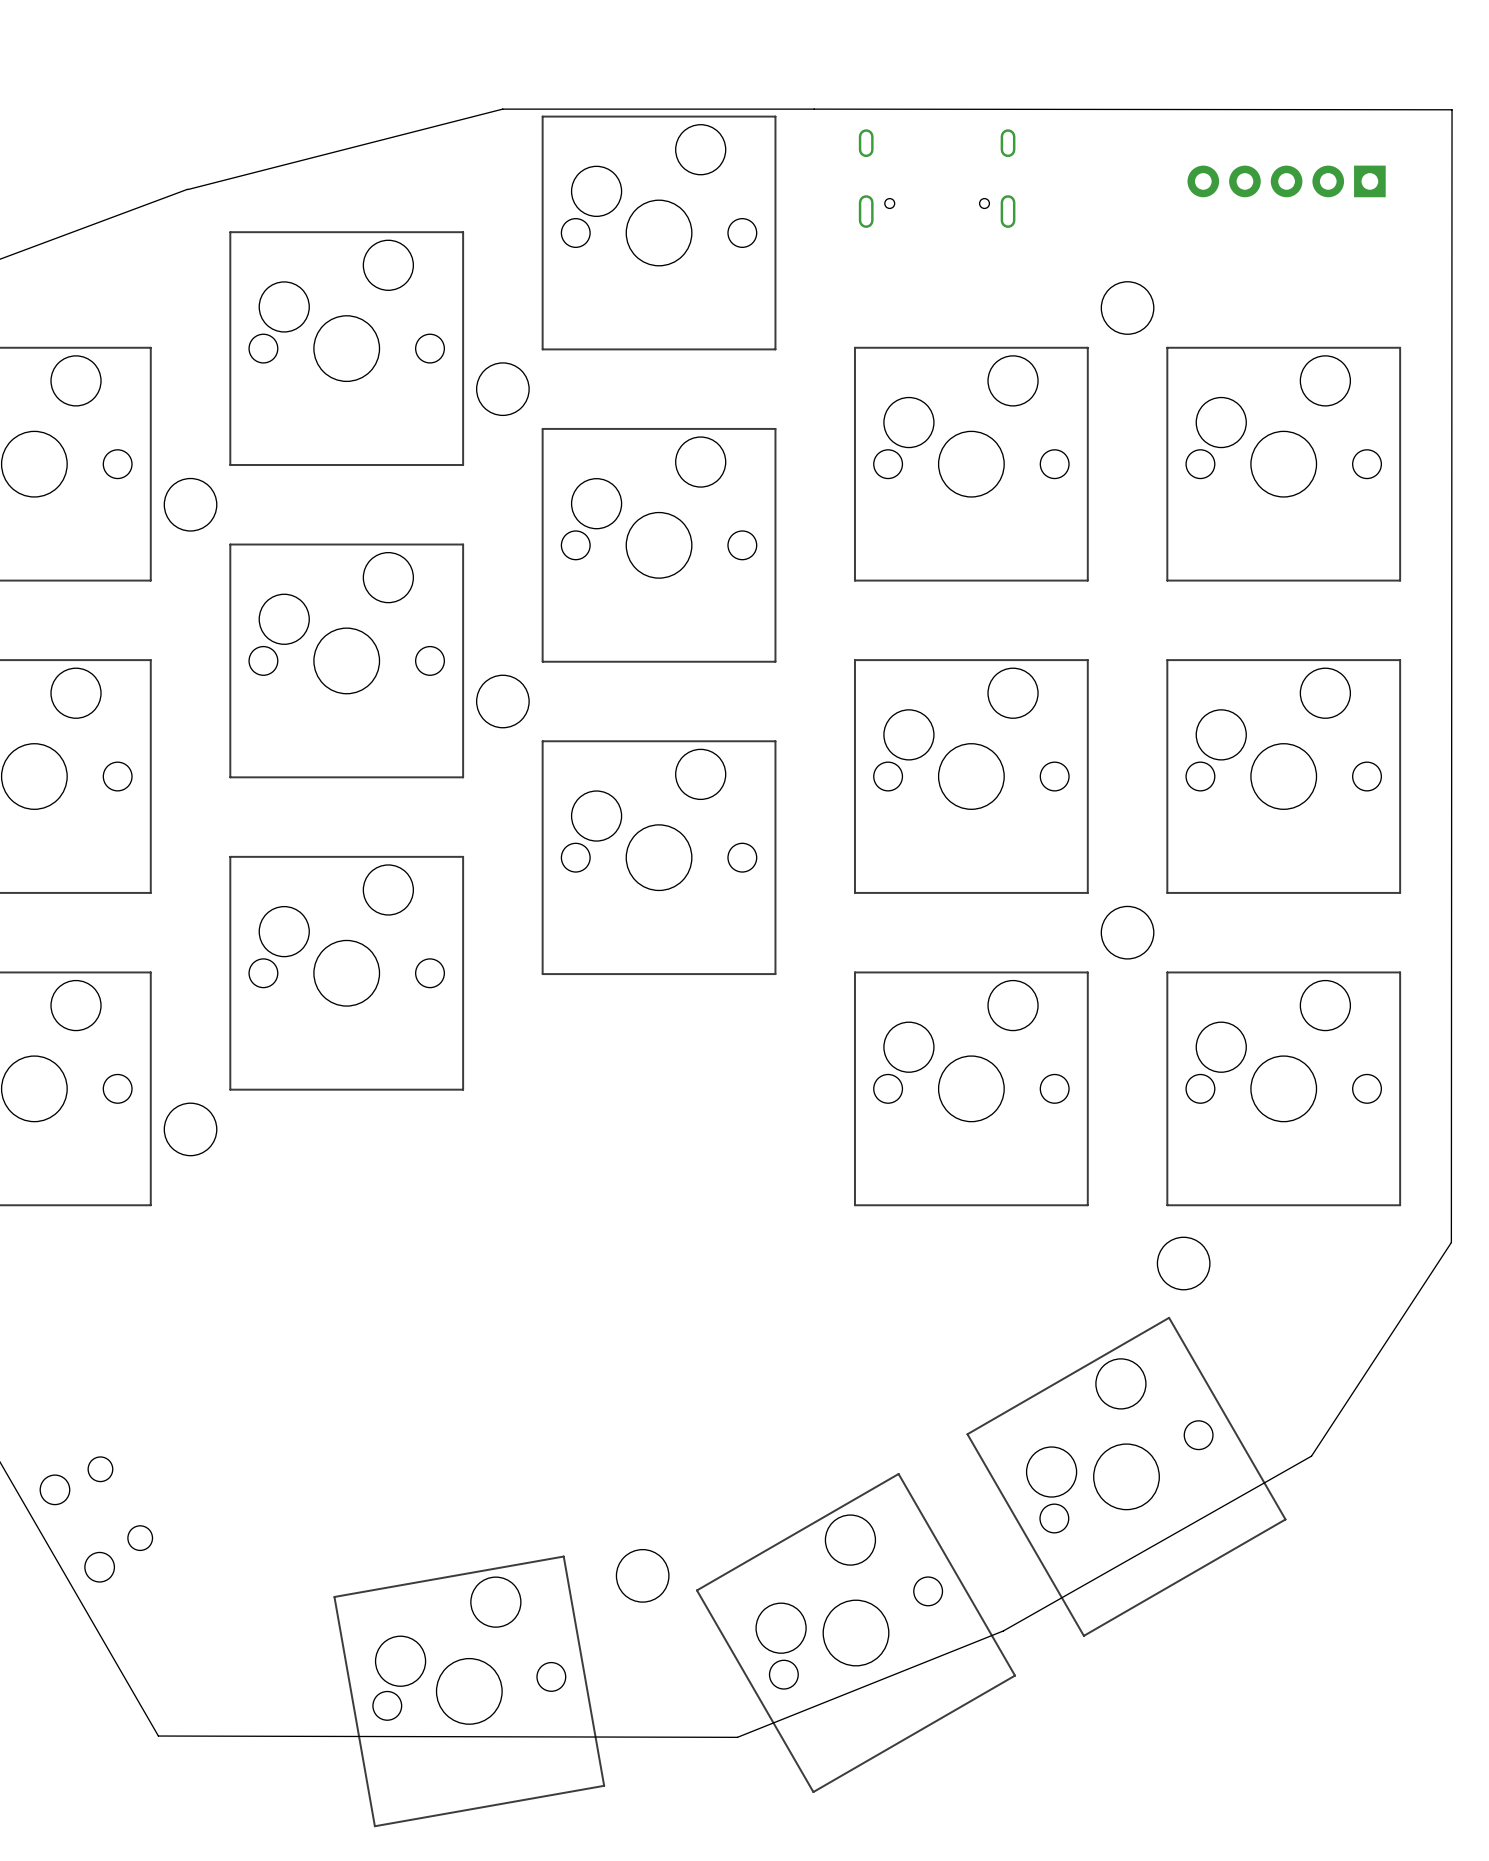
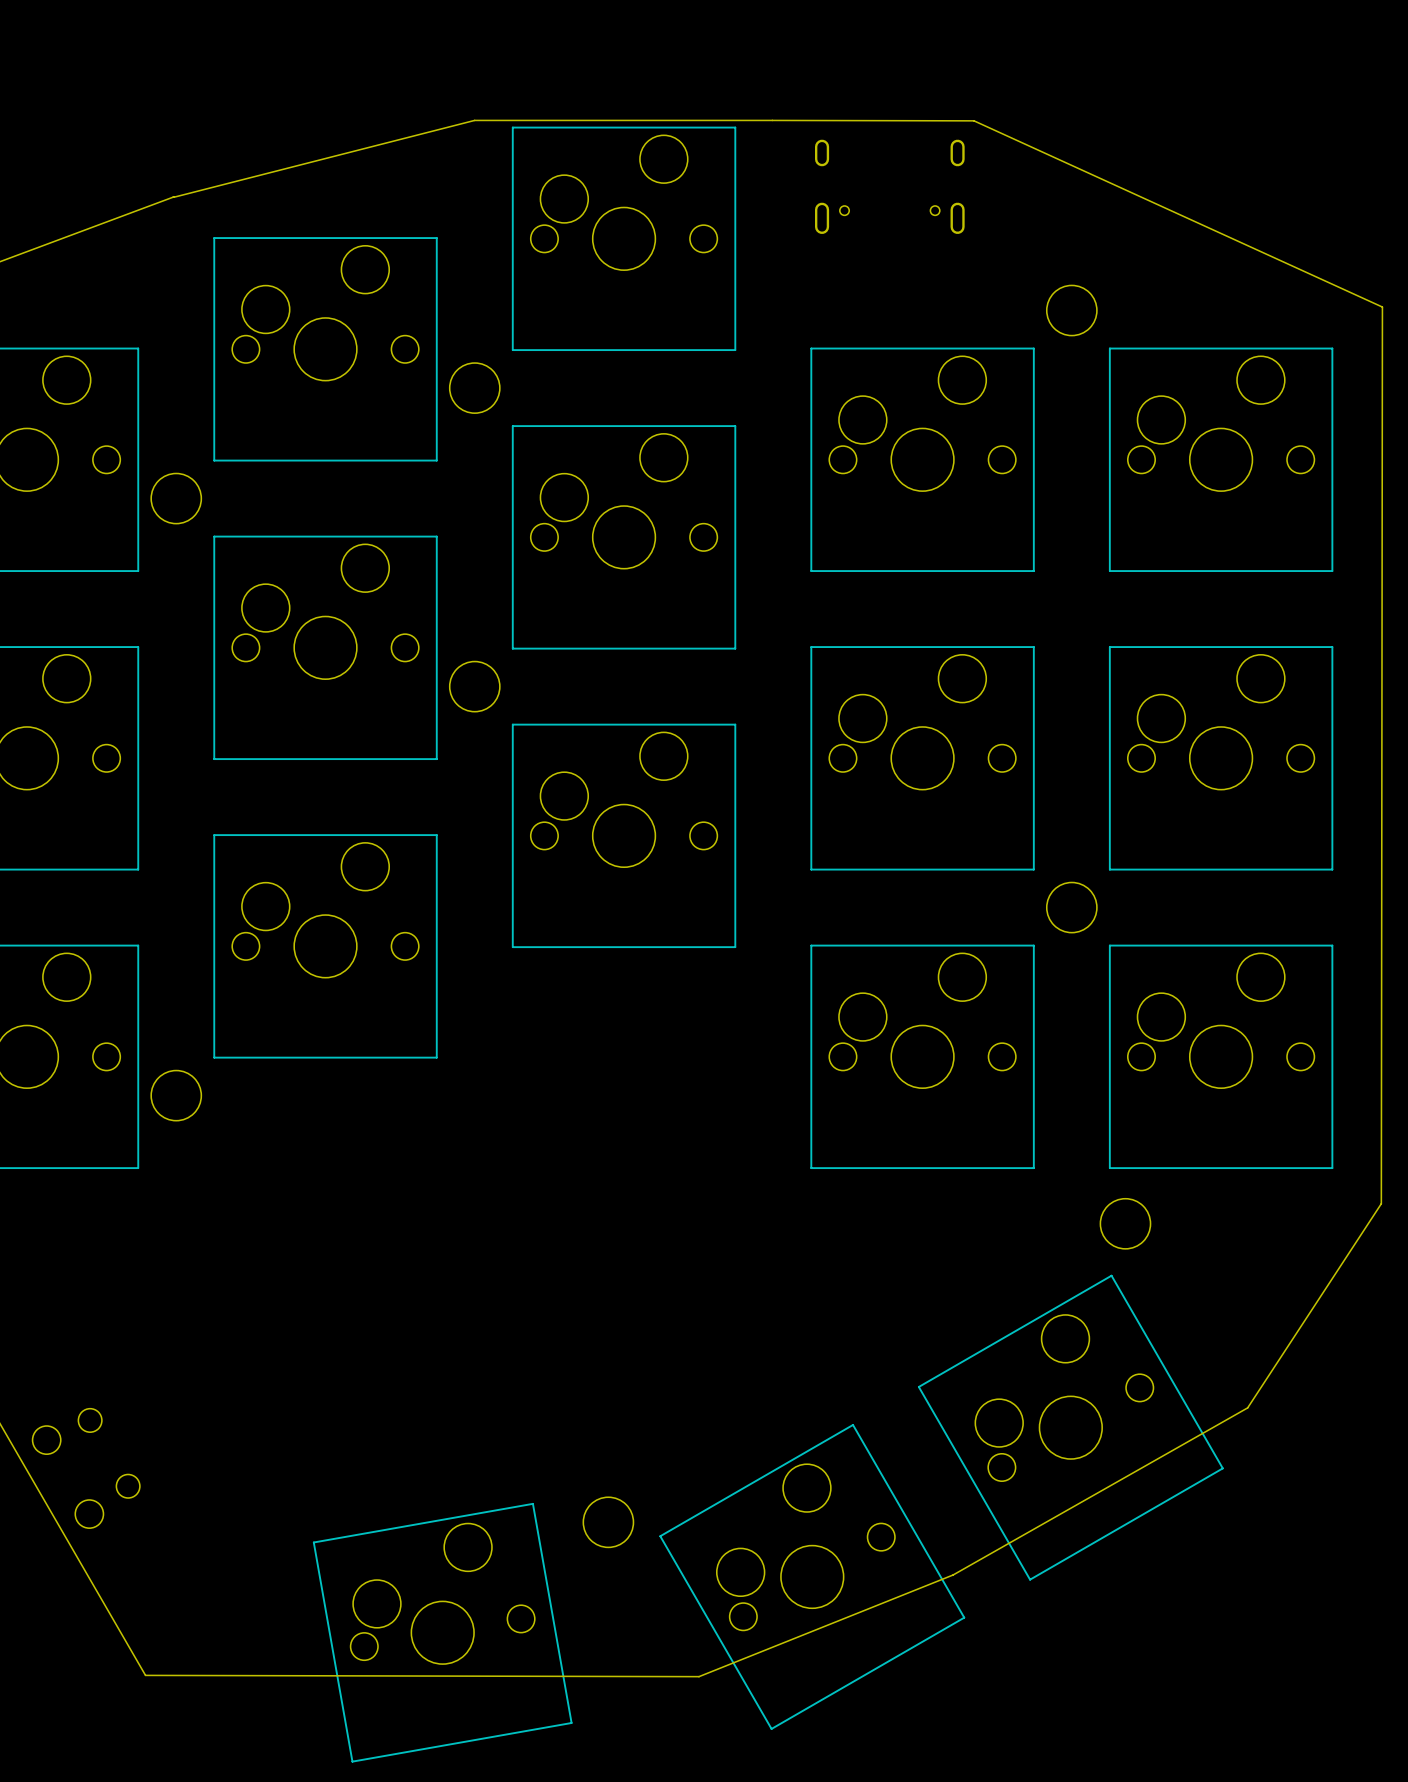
board edge: (814, 109) (1452, 109) (1451, 1242) -> (772, 120) (974, 120) (1382, 307) (1381, 1203)
part: (1286, 181) -> none

